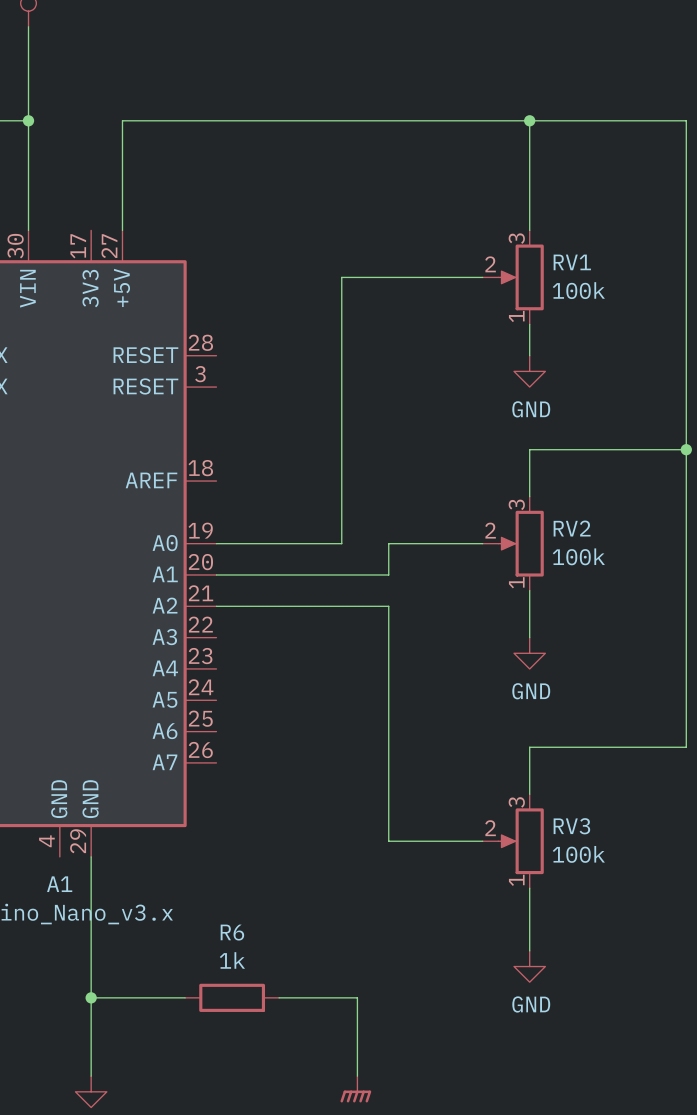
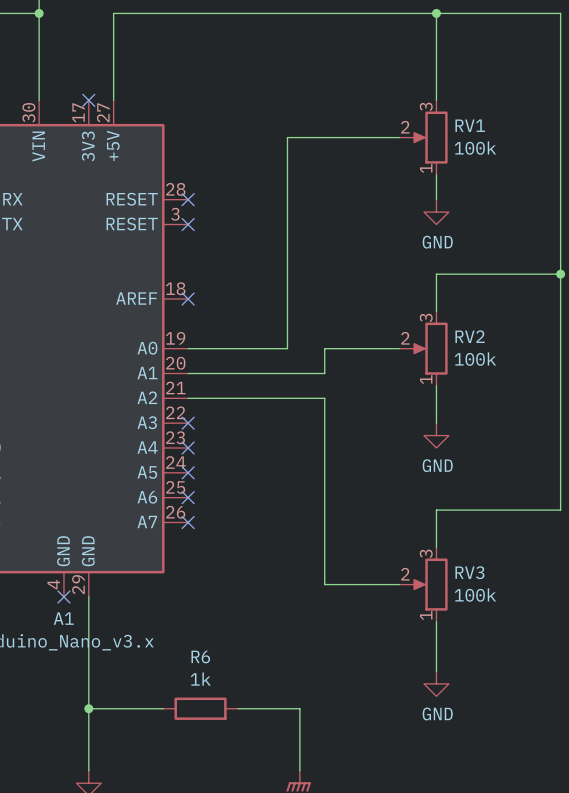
no-connect mark: none -> (88, 100)
no-connect mark: none -> (188, 199)
no-connect mark: none -> (188, 224)
no-connect mark: none -> (188, 299)
no-connect mark: none -> (188, 423)
no-connect mark: none -> (188, 447)
no-connect mark: none -> (188, 472)
no-connect mark: none -> (188, 497)
no-connect mark: none -> (188, 522)
no-connect mark: none -> (63, 596)

